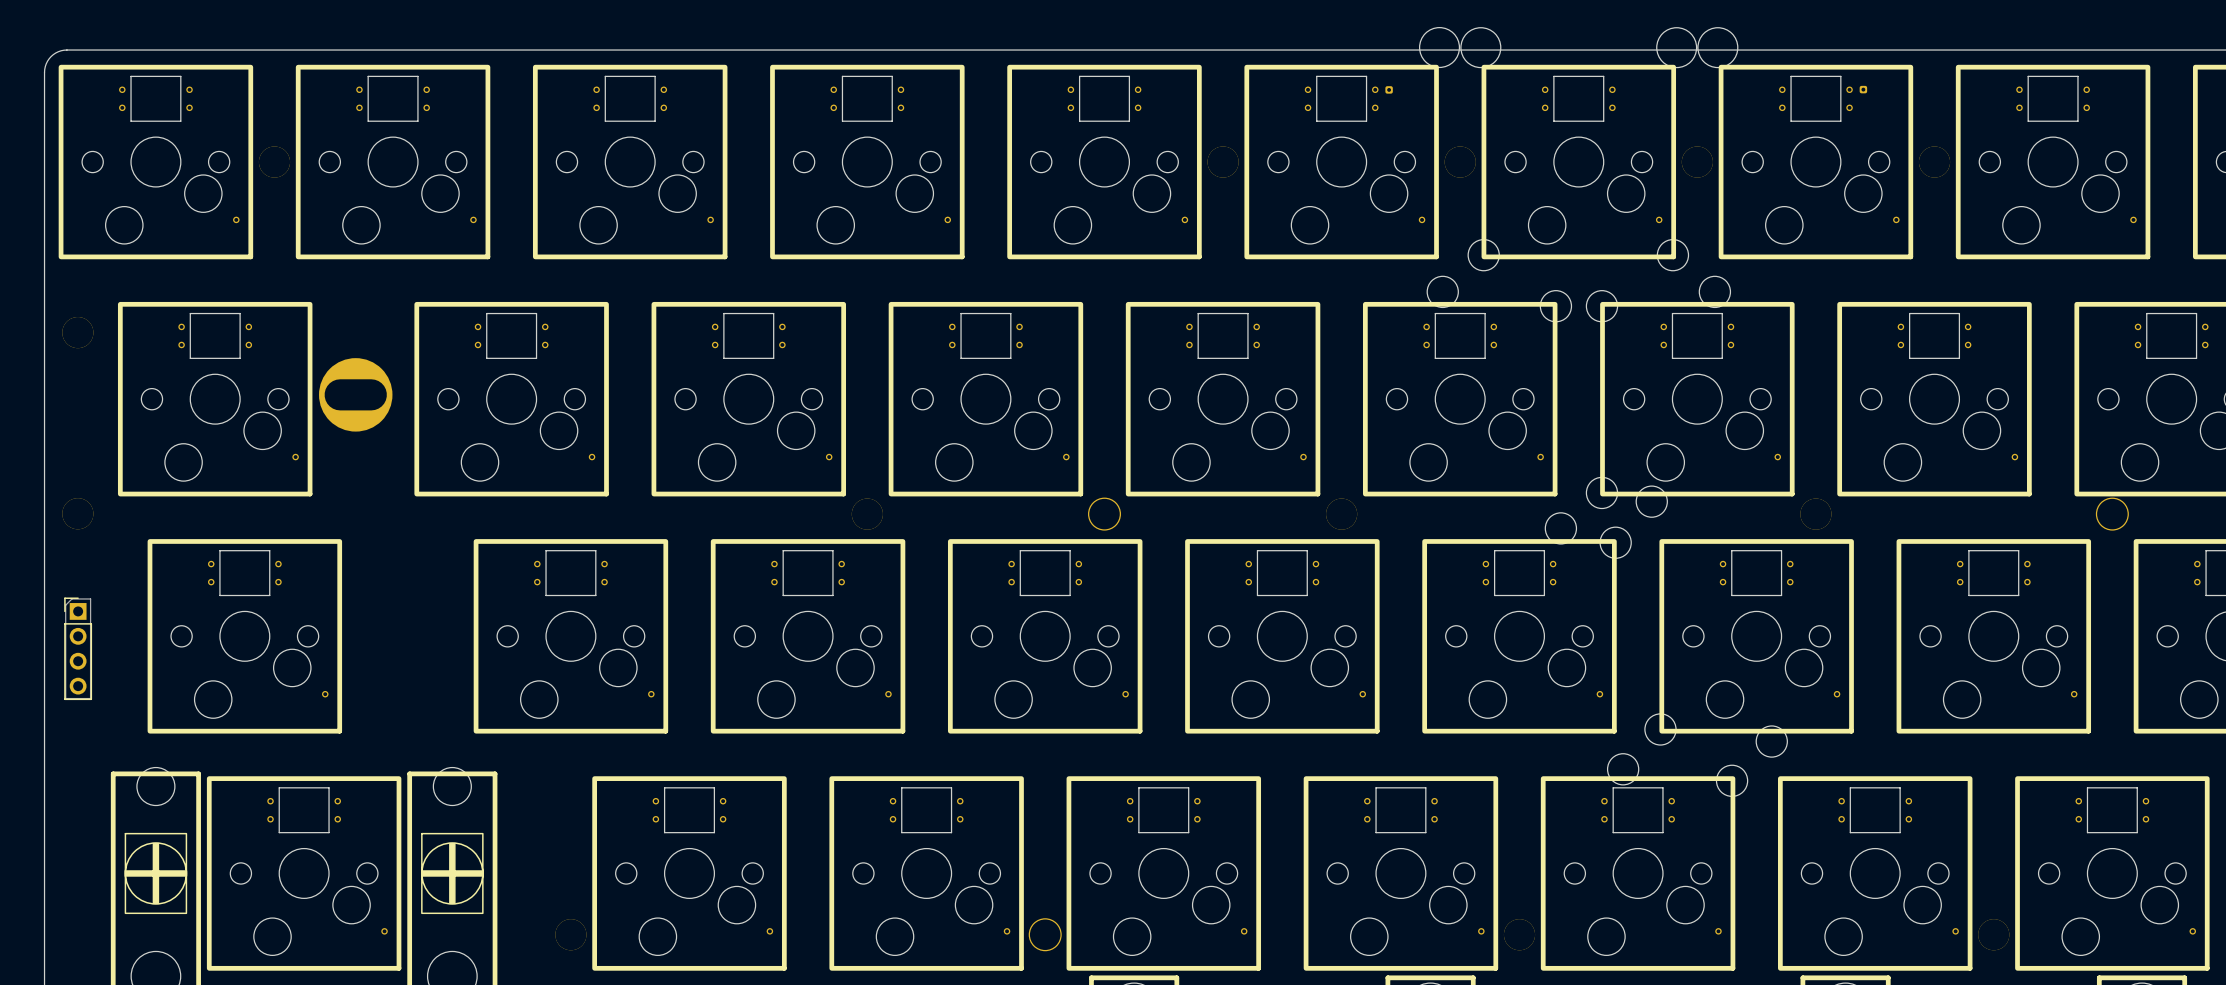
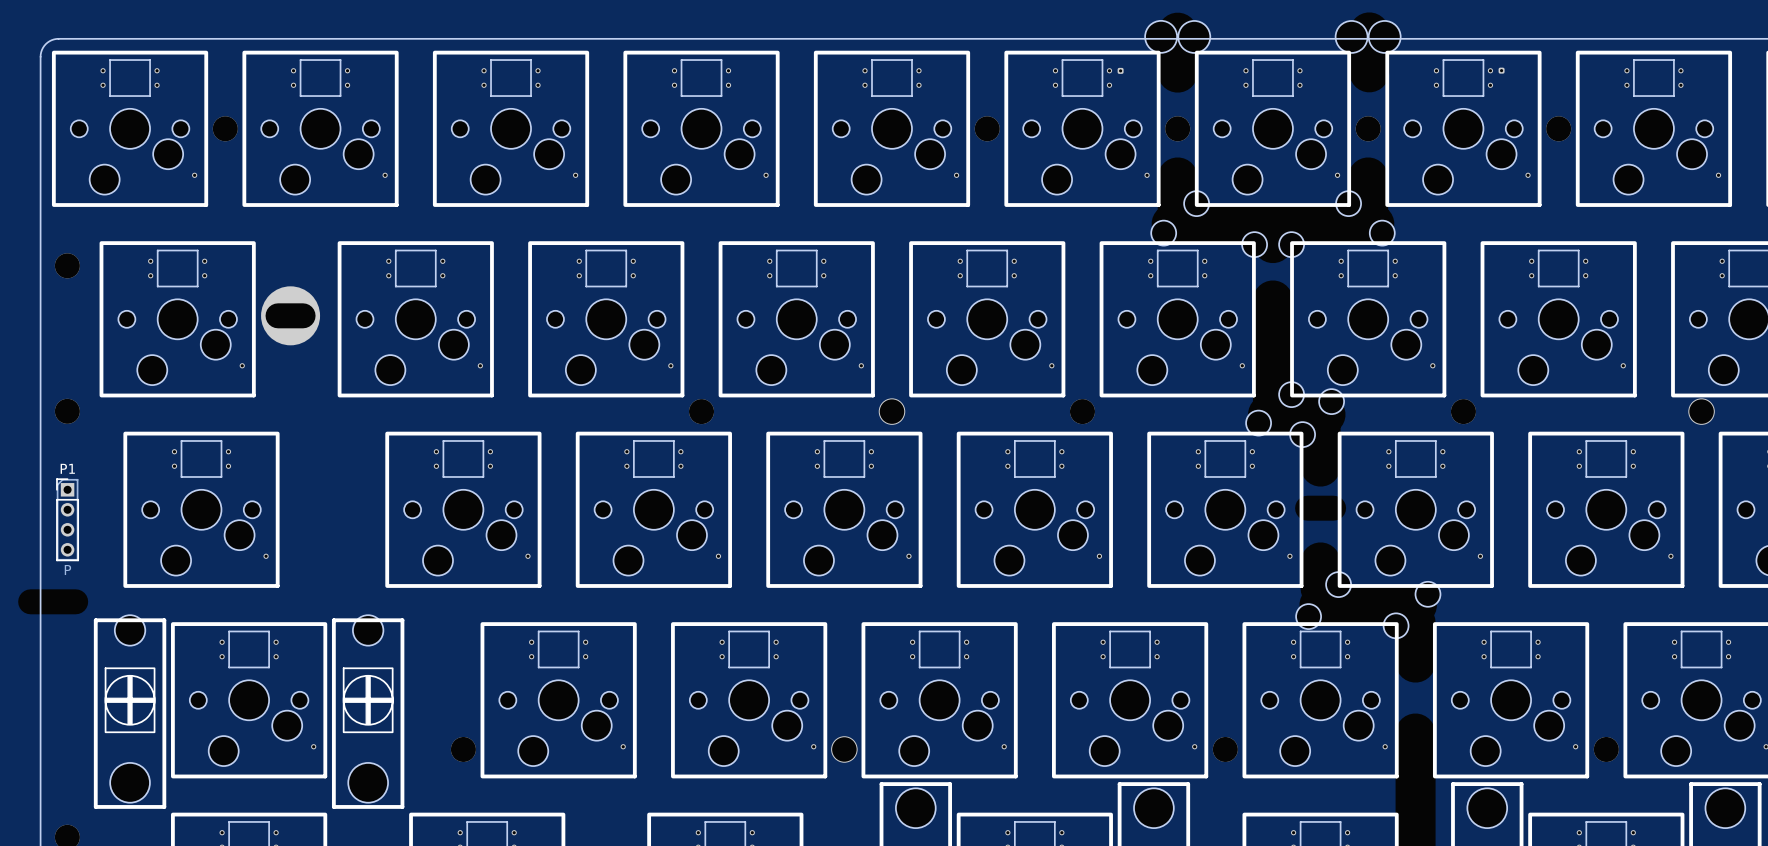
P1 name: none -> P1 (67, 468)
P1 value: none -> P (67, 570)

